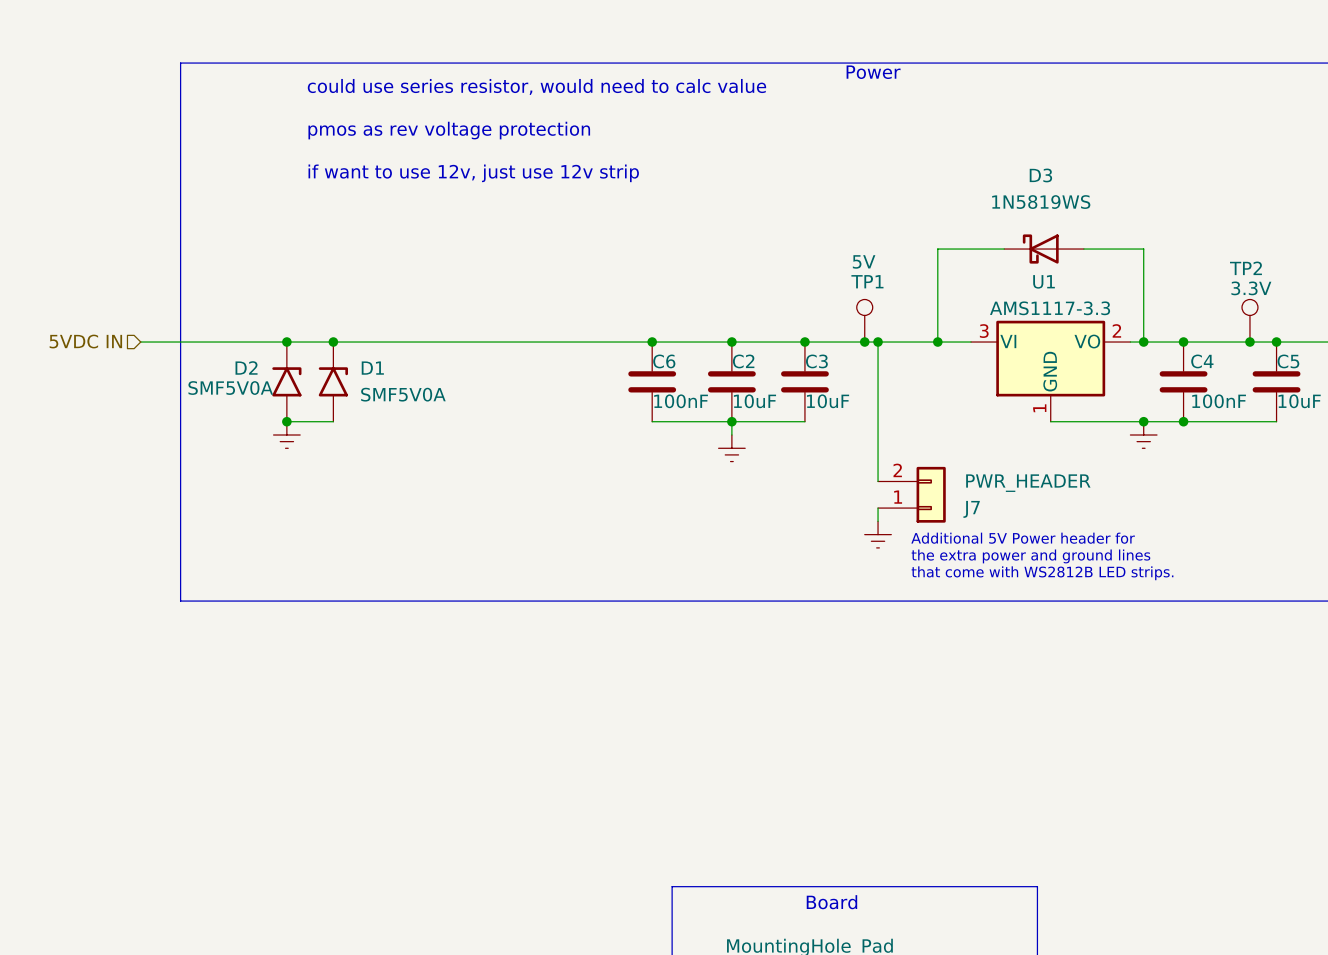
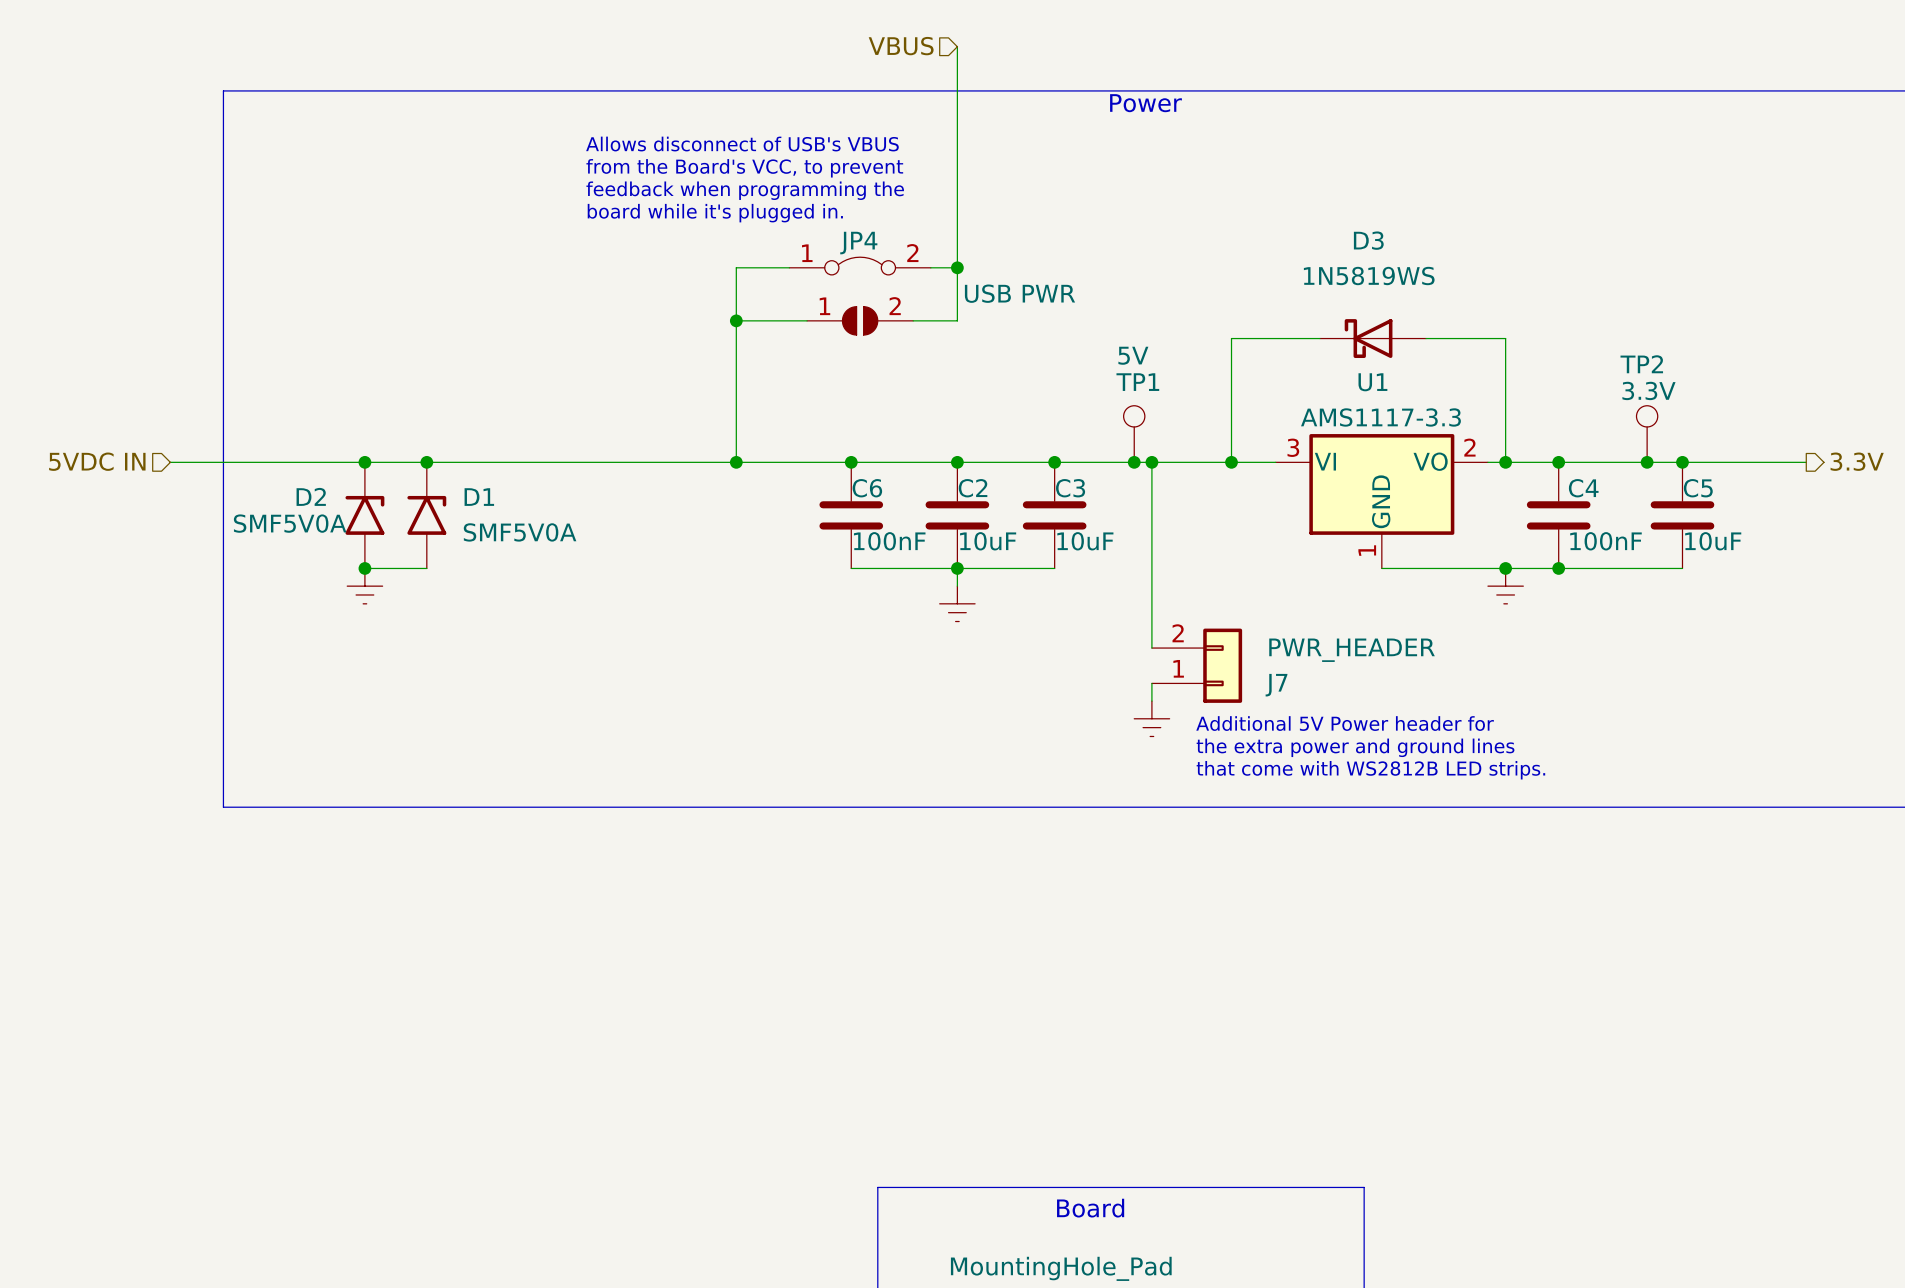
hierarchical label: none -> VBUS (901, 46)
wire: none -> (957, 46) (957, 320) (913, 320)
text: could use series resistor, would need to calc value (536, 86) -> none
text: none -> Allows disconnect of USB's VBUS (742, 144)
text: none -> from the Board's VCC, to prevent (744, 168)
text: pmos as rev voltage protection (449, 130) -> none
text: none -> feedback when programming the (745, 190)
text: none -> board while it's plugged in. (715, 213)
text: if want to use 12v, just use 12v strip (473, 173) -> none
JP4: none -> (860, 266)
wire: none -> (789, 267) (736, 267) (736, 462)
wire: none -> (930, 267) (957, 267)
junction: none -> (957, 267)
wire: none -> (736, 320) (807, 320)
junction: none -> (736, 320)
part: none -> USB PWR (860, 320)
junction: none -> (736, 462)

